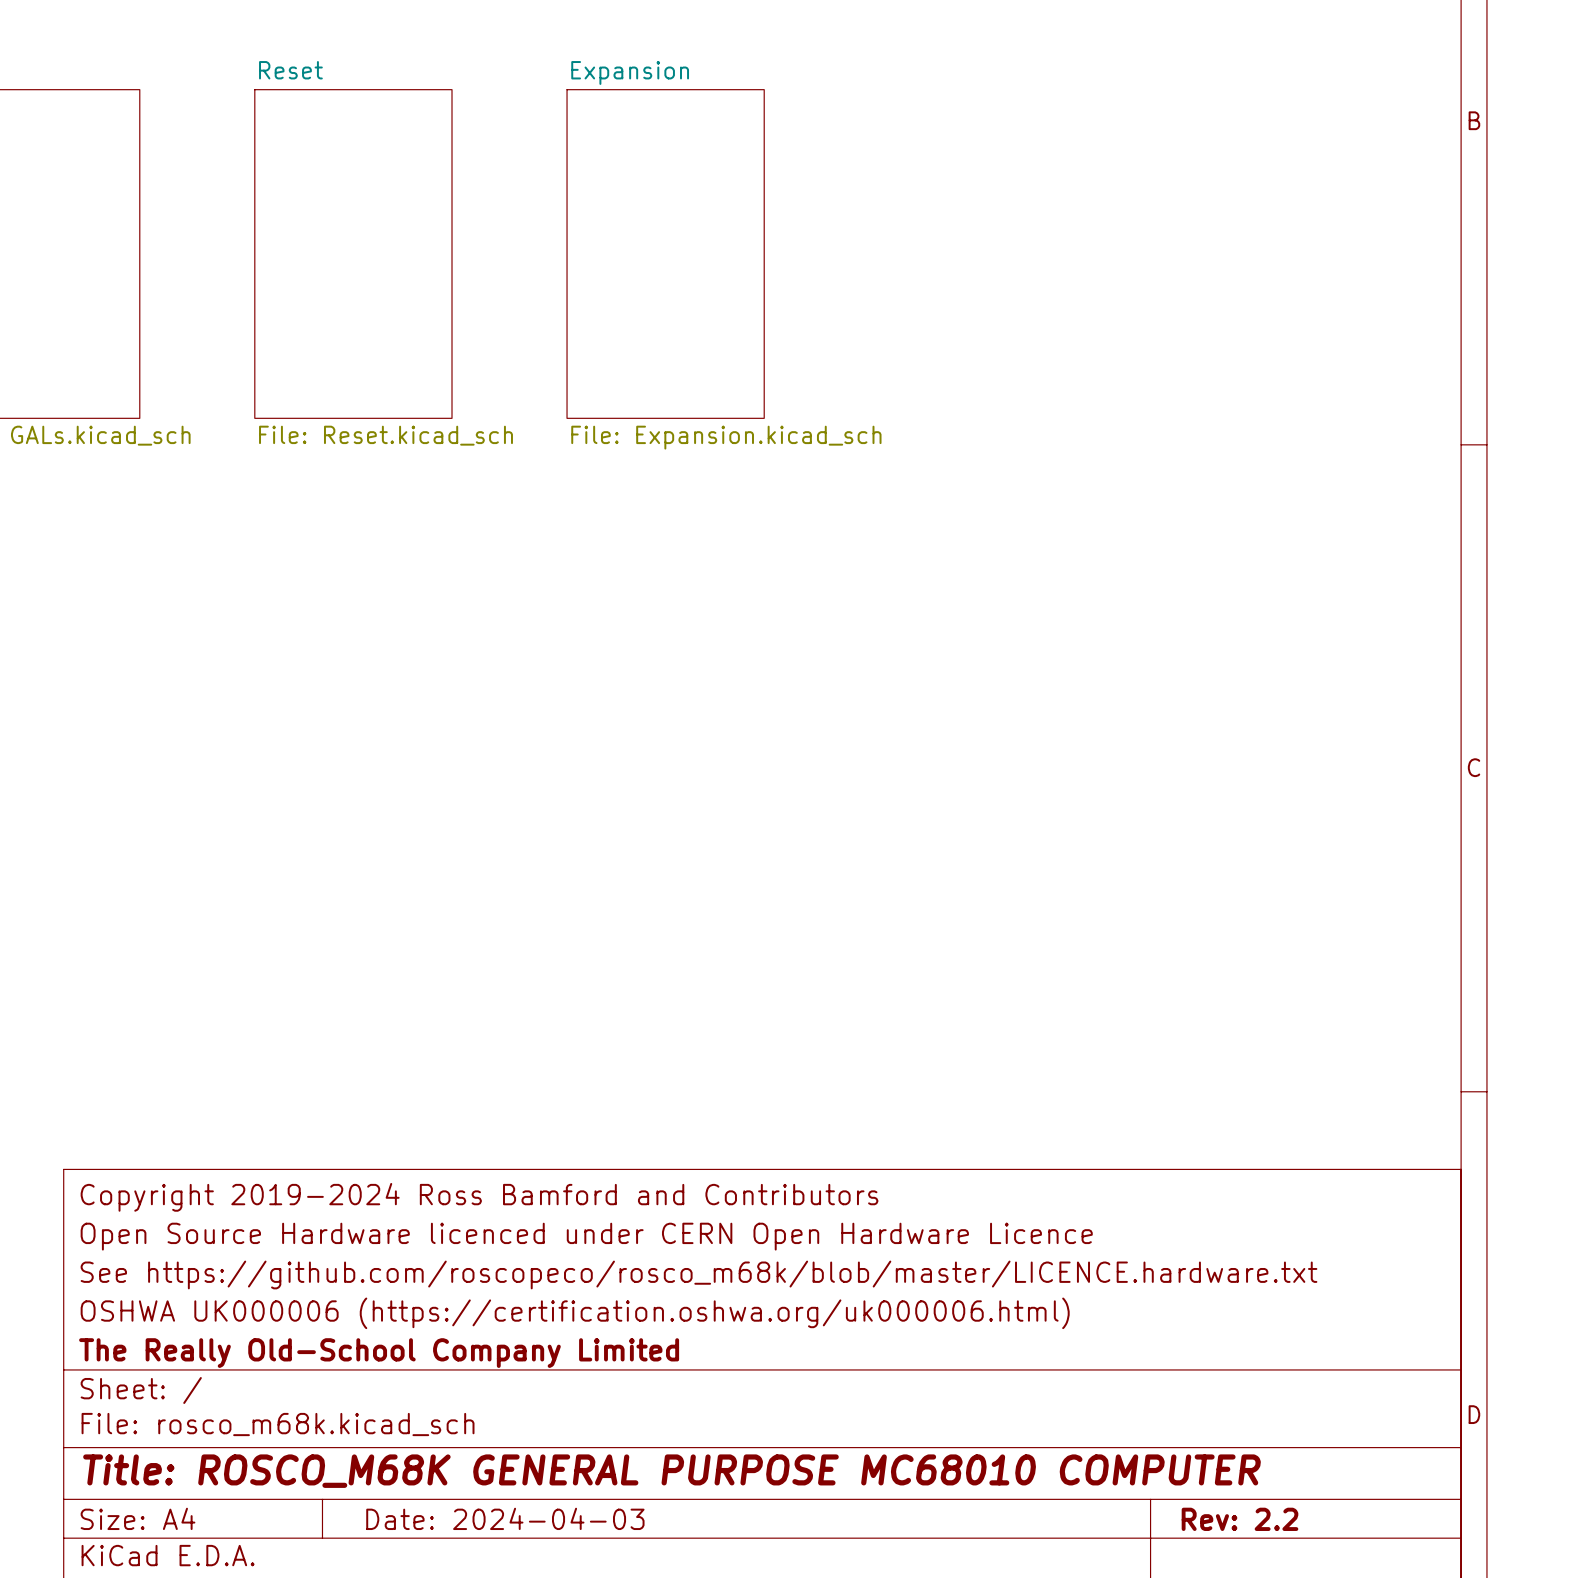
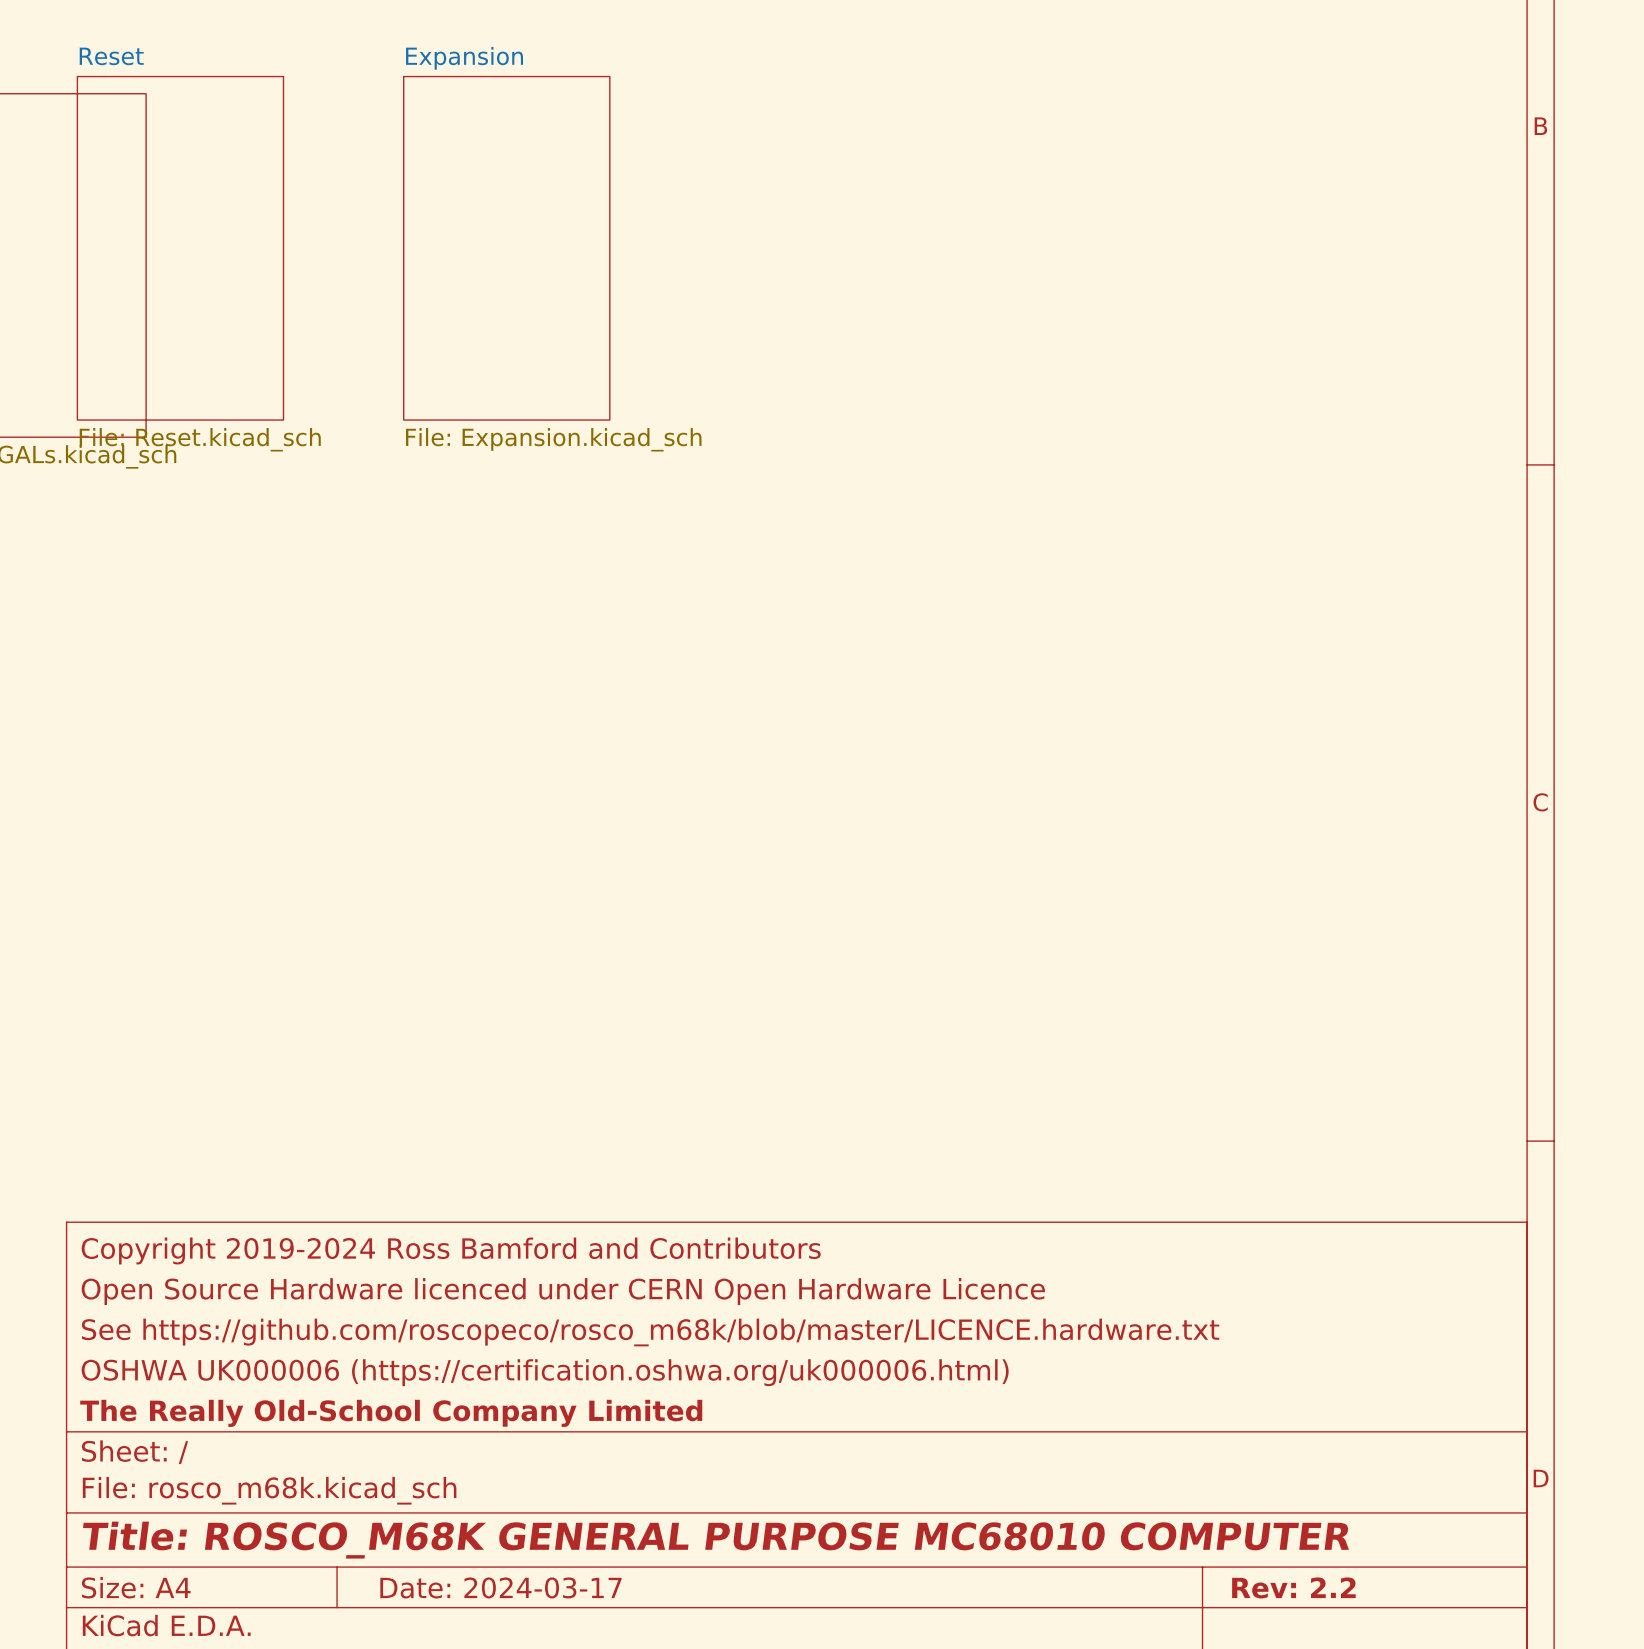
sheet Reset position: (353, 254) -> (180, 248)
sheet Expansion position: (665, 254) -> (506, 248)
title block: Date: 2024-04-03 (505, 1518) -> Date: 2024-03-17 (500, 1587)

